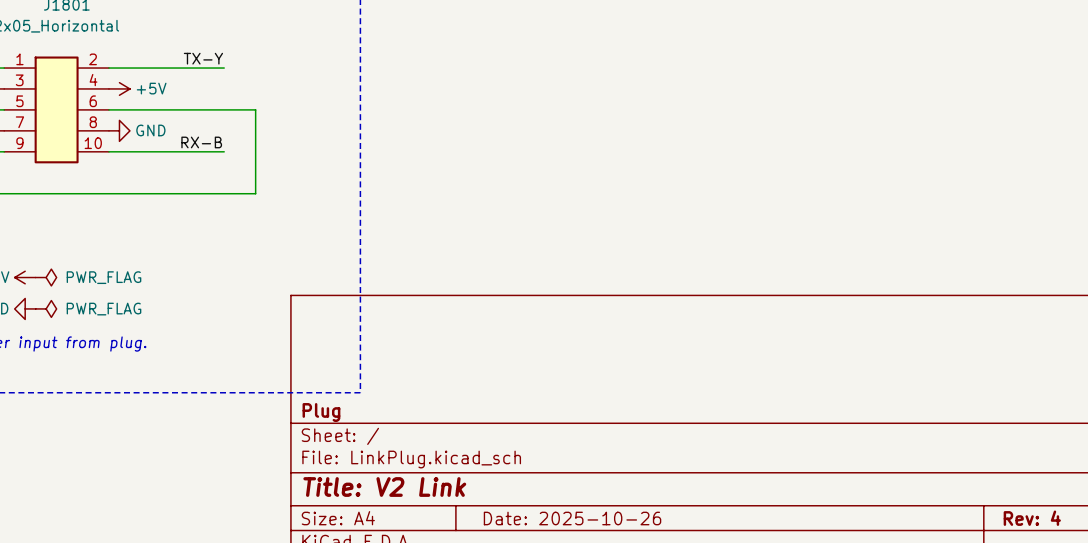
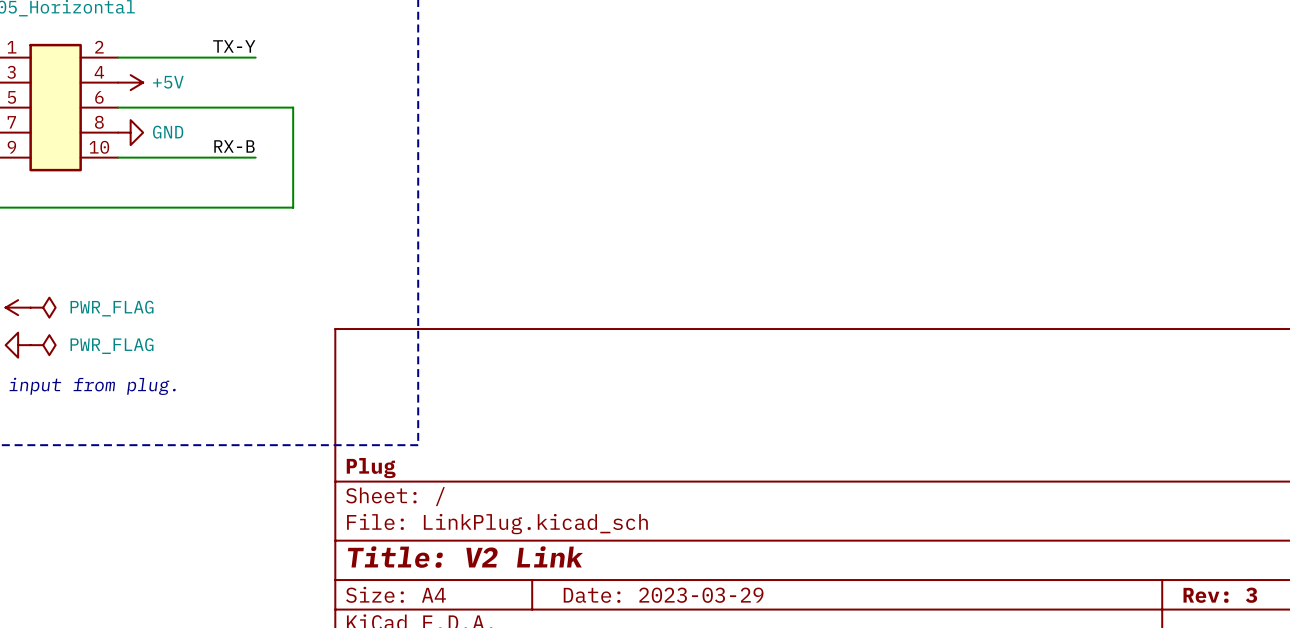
title block: Date: 2025-10-26 (572, 518) -> Date: 2023-03-29 (663, 595)
title block: Rev: 4 (1032, 518) -> Rev: 3 (1220, 595)

